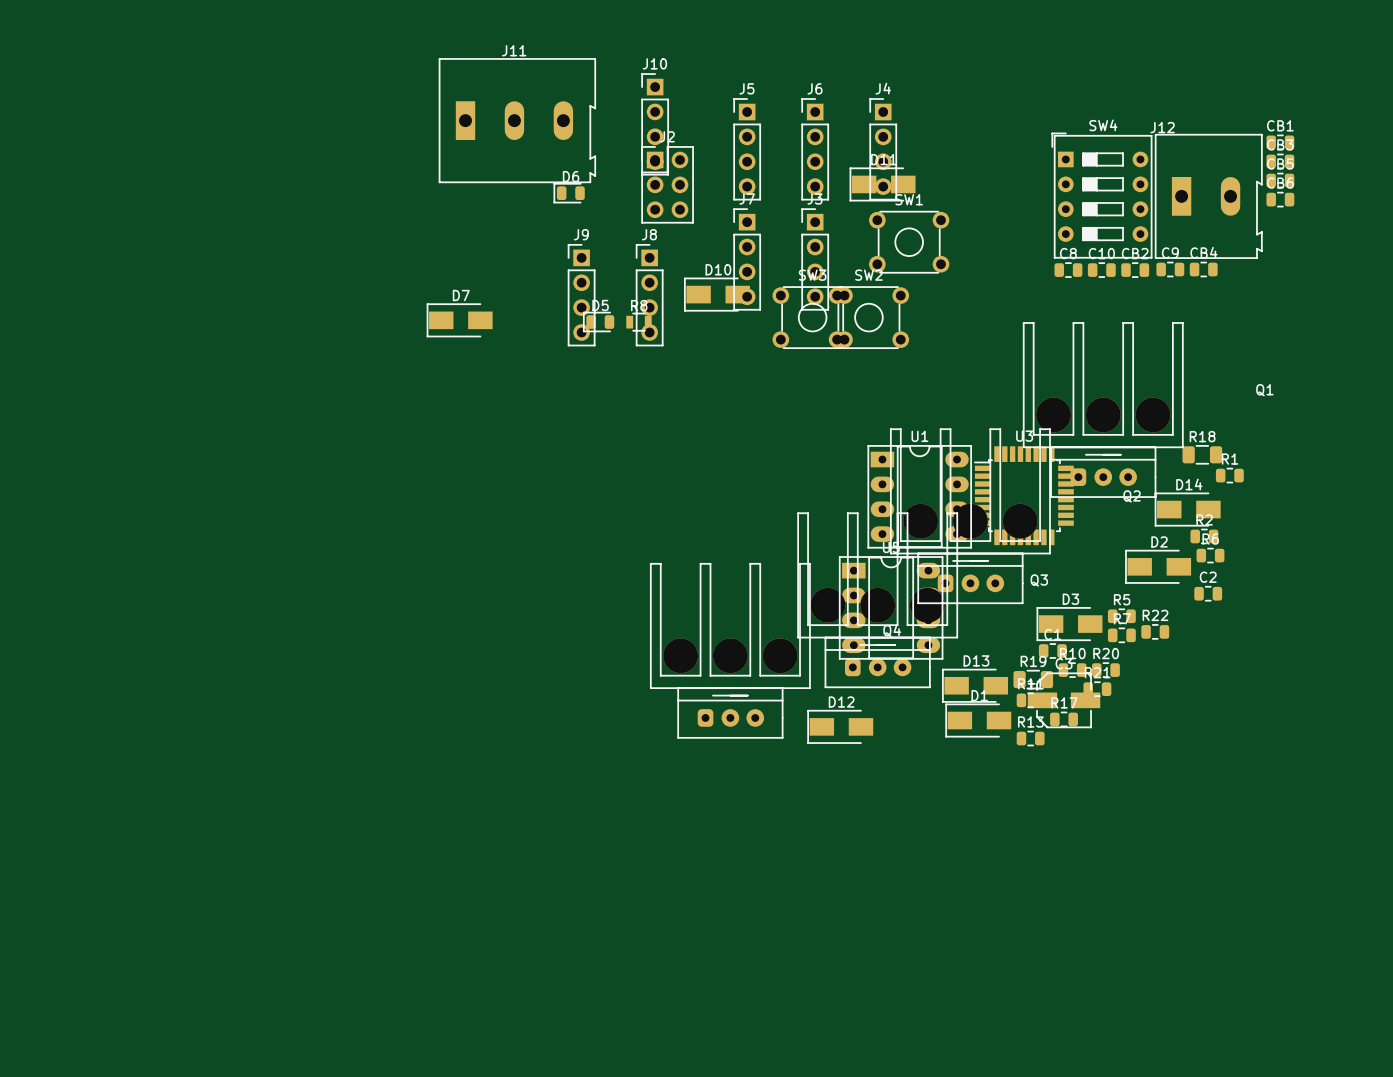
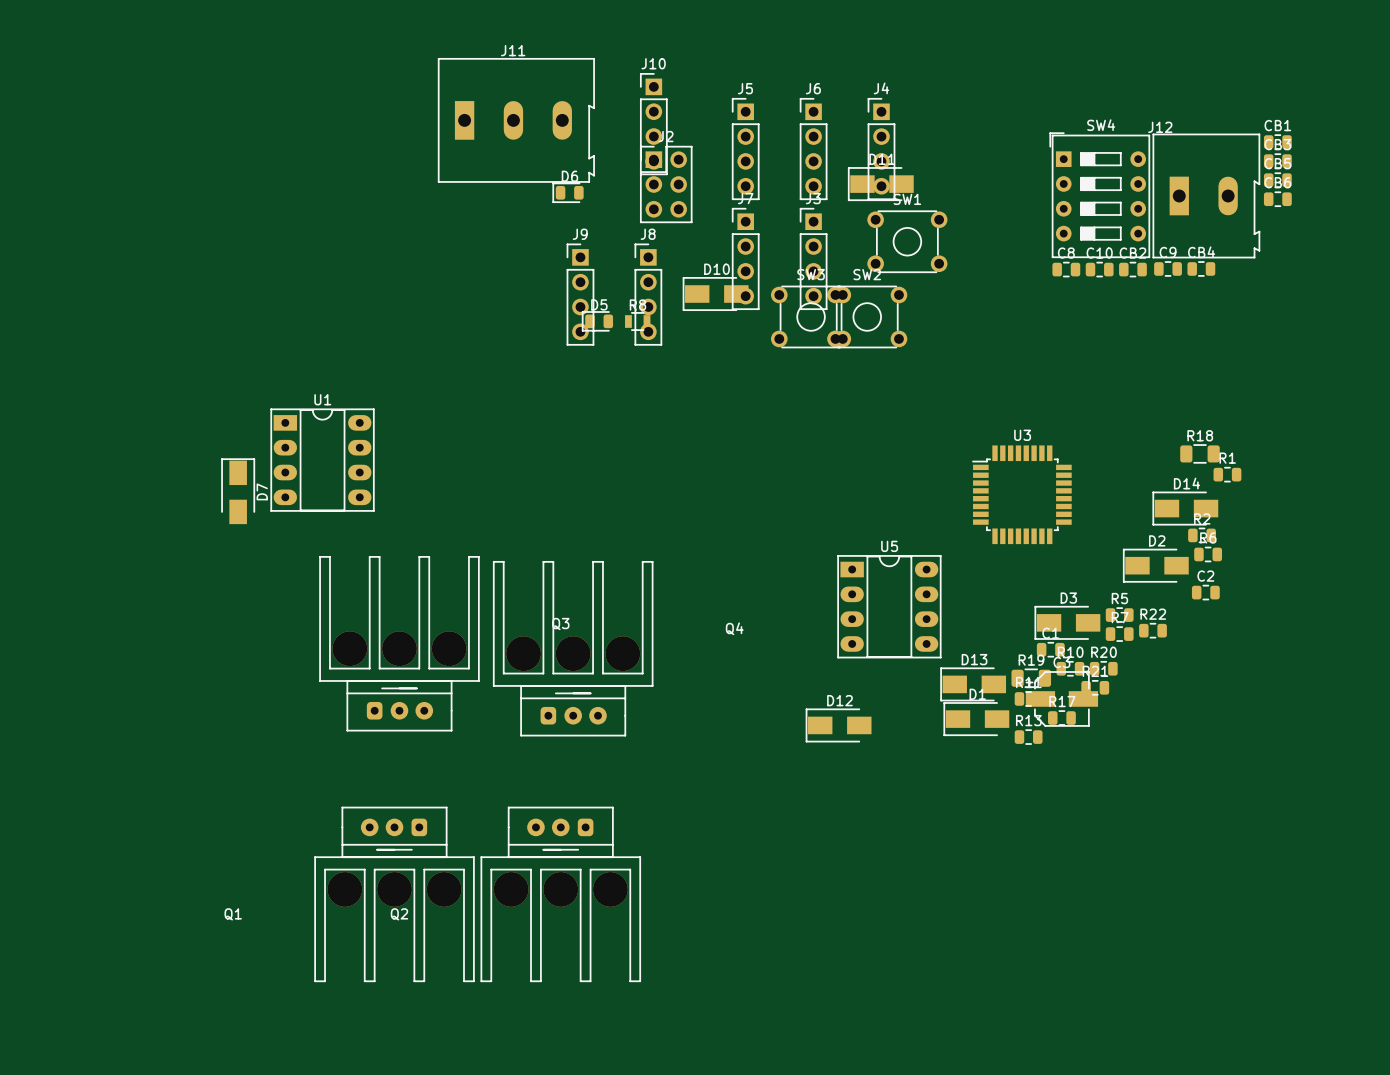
D7 rotation: 0° (459, 320) -> 90° clockwise (238, 491)
D7 position: (459, 320) -> (238, 491)
Q1 rotation: 0° (1103, 410) -> 180° (394, 894)
Q1 position: (1103, 410) -> (394, 894)
U1 position: (919, 496) -> (322, 460)
Q2 rotation: 0° (970, 516) -> 180° (560, 894)
Q2 position: (970, 516) -> (560, 894)
Q3 position: (877, 600) -> (399, 643)
Q4 position: (730, 650) -> (573, 648)

